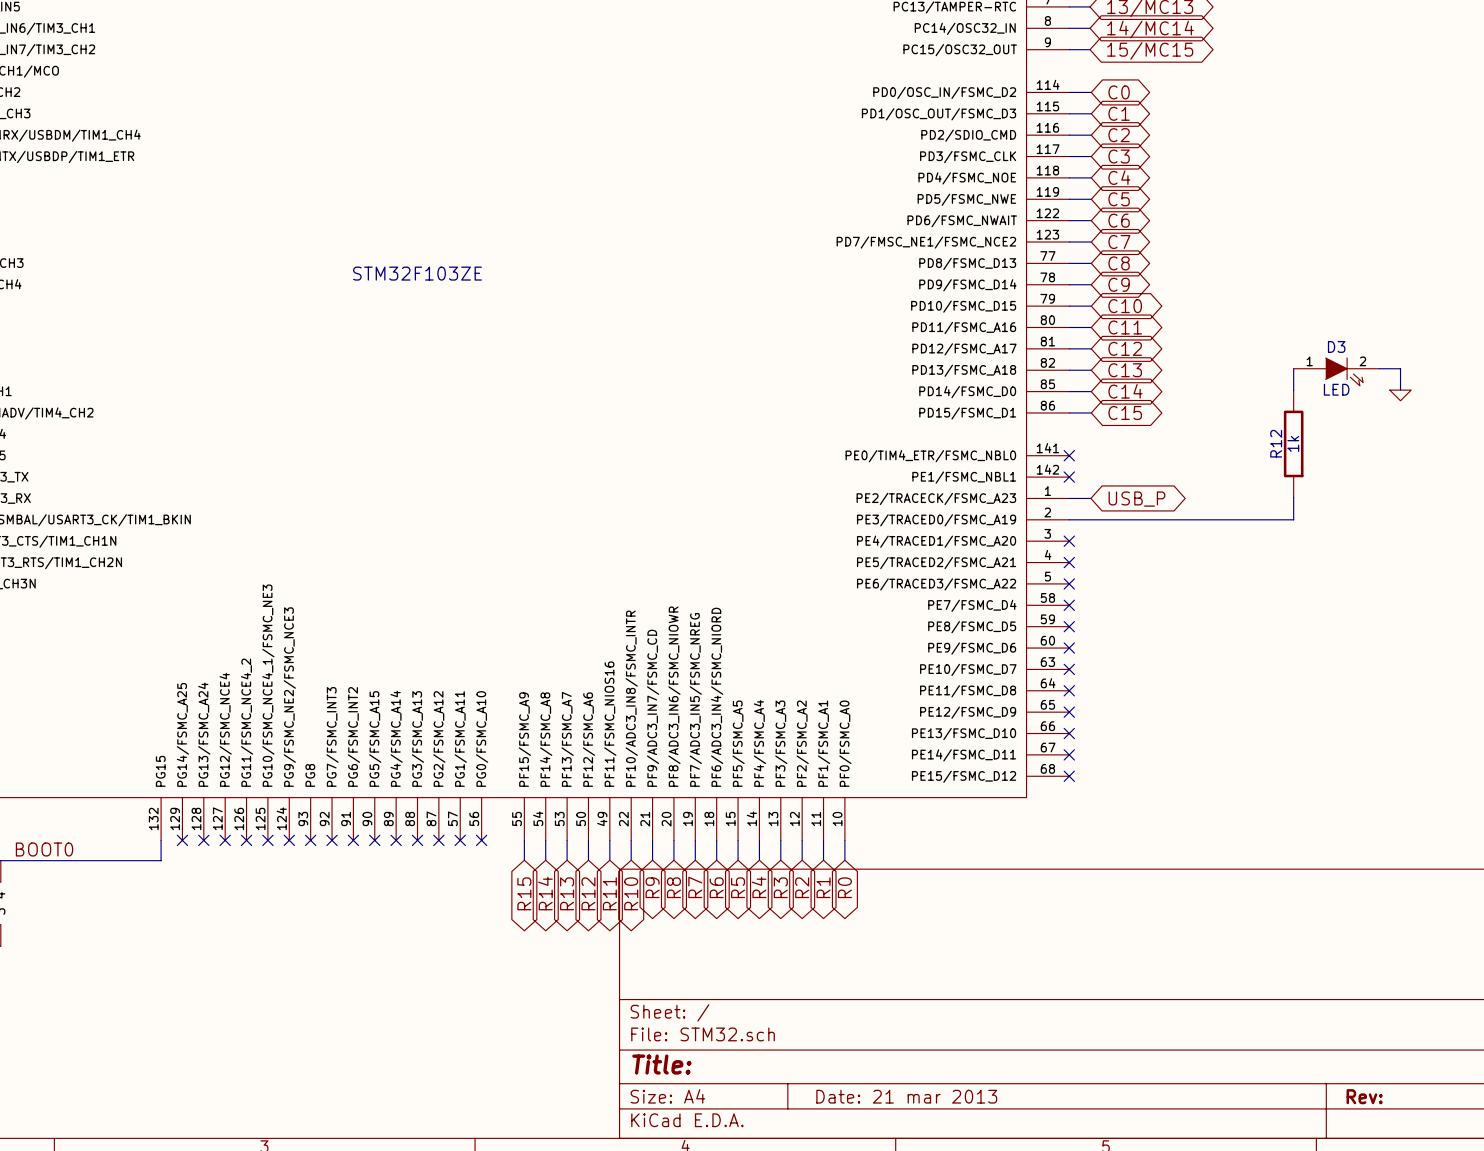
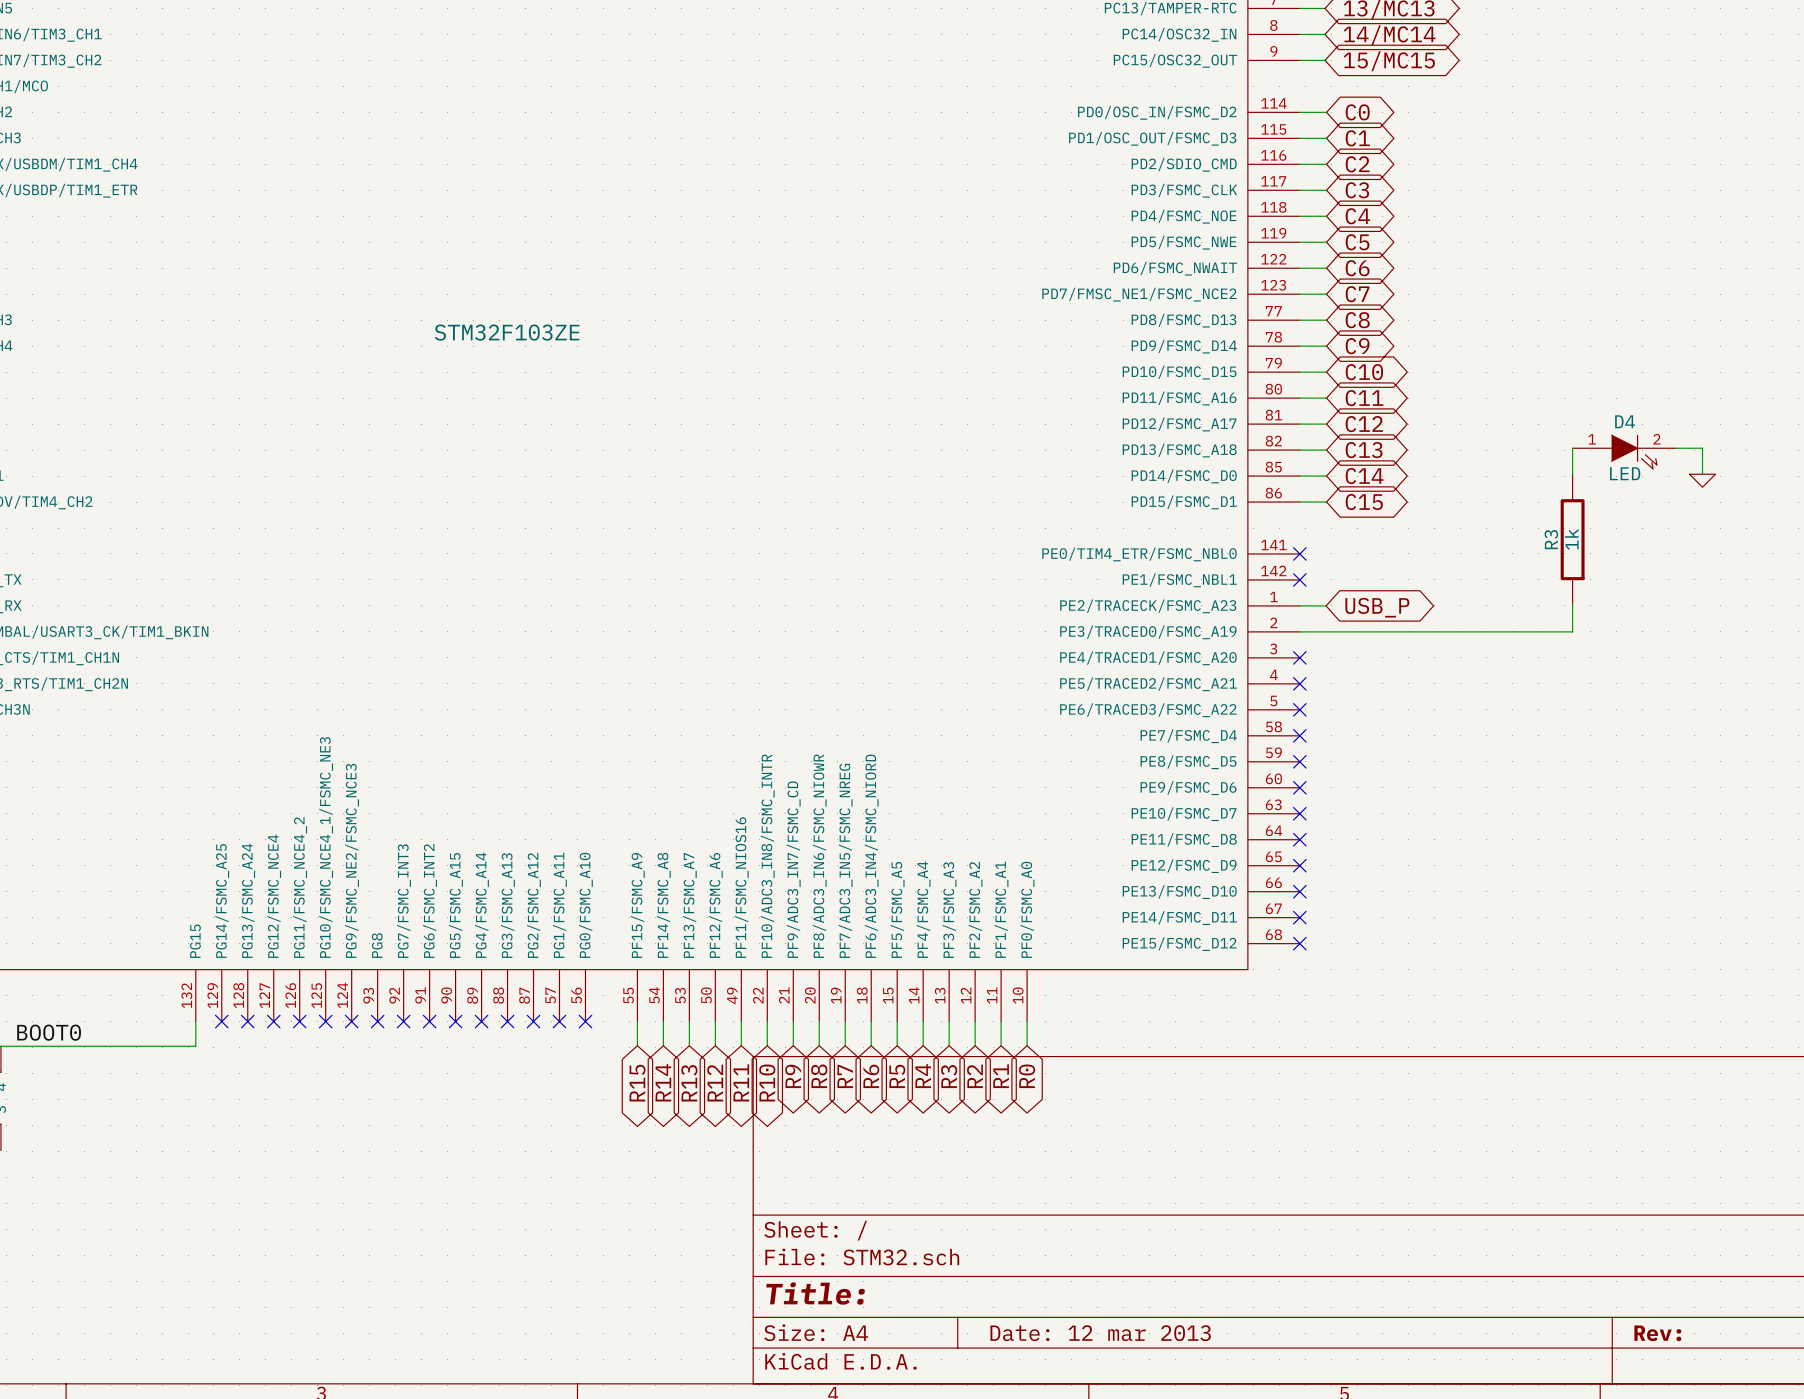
D3 name: D3 (1336, 346) -> D4 (1625, 421)
R12 name: R12 (1276, 443) -> R3 (1551, 539)
title block: Date: 21 mar 2013 (906, 1096) -> Date: 12 mar 2013 (1100, 1333)

